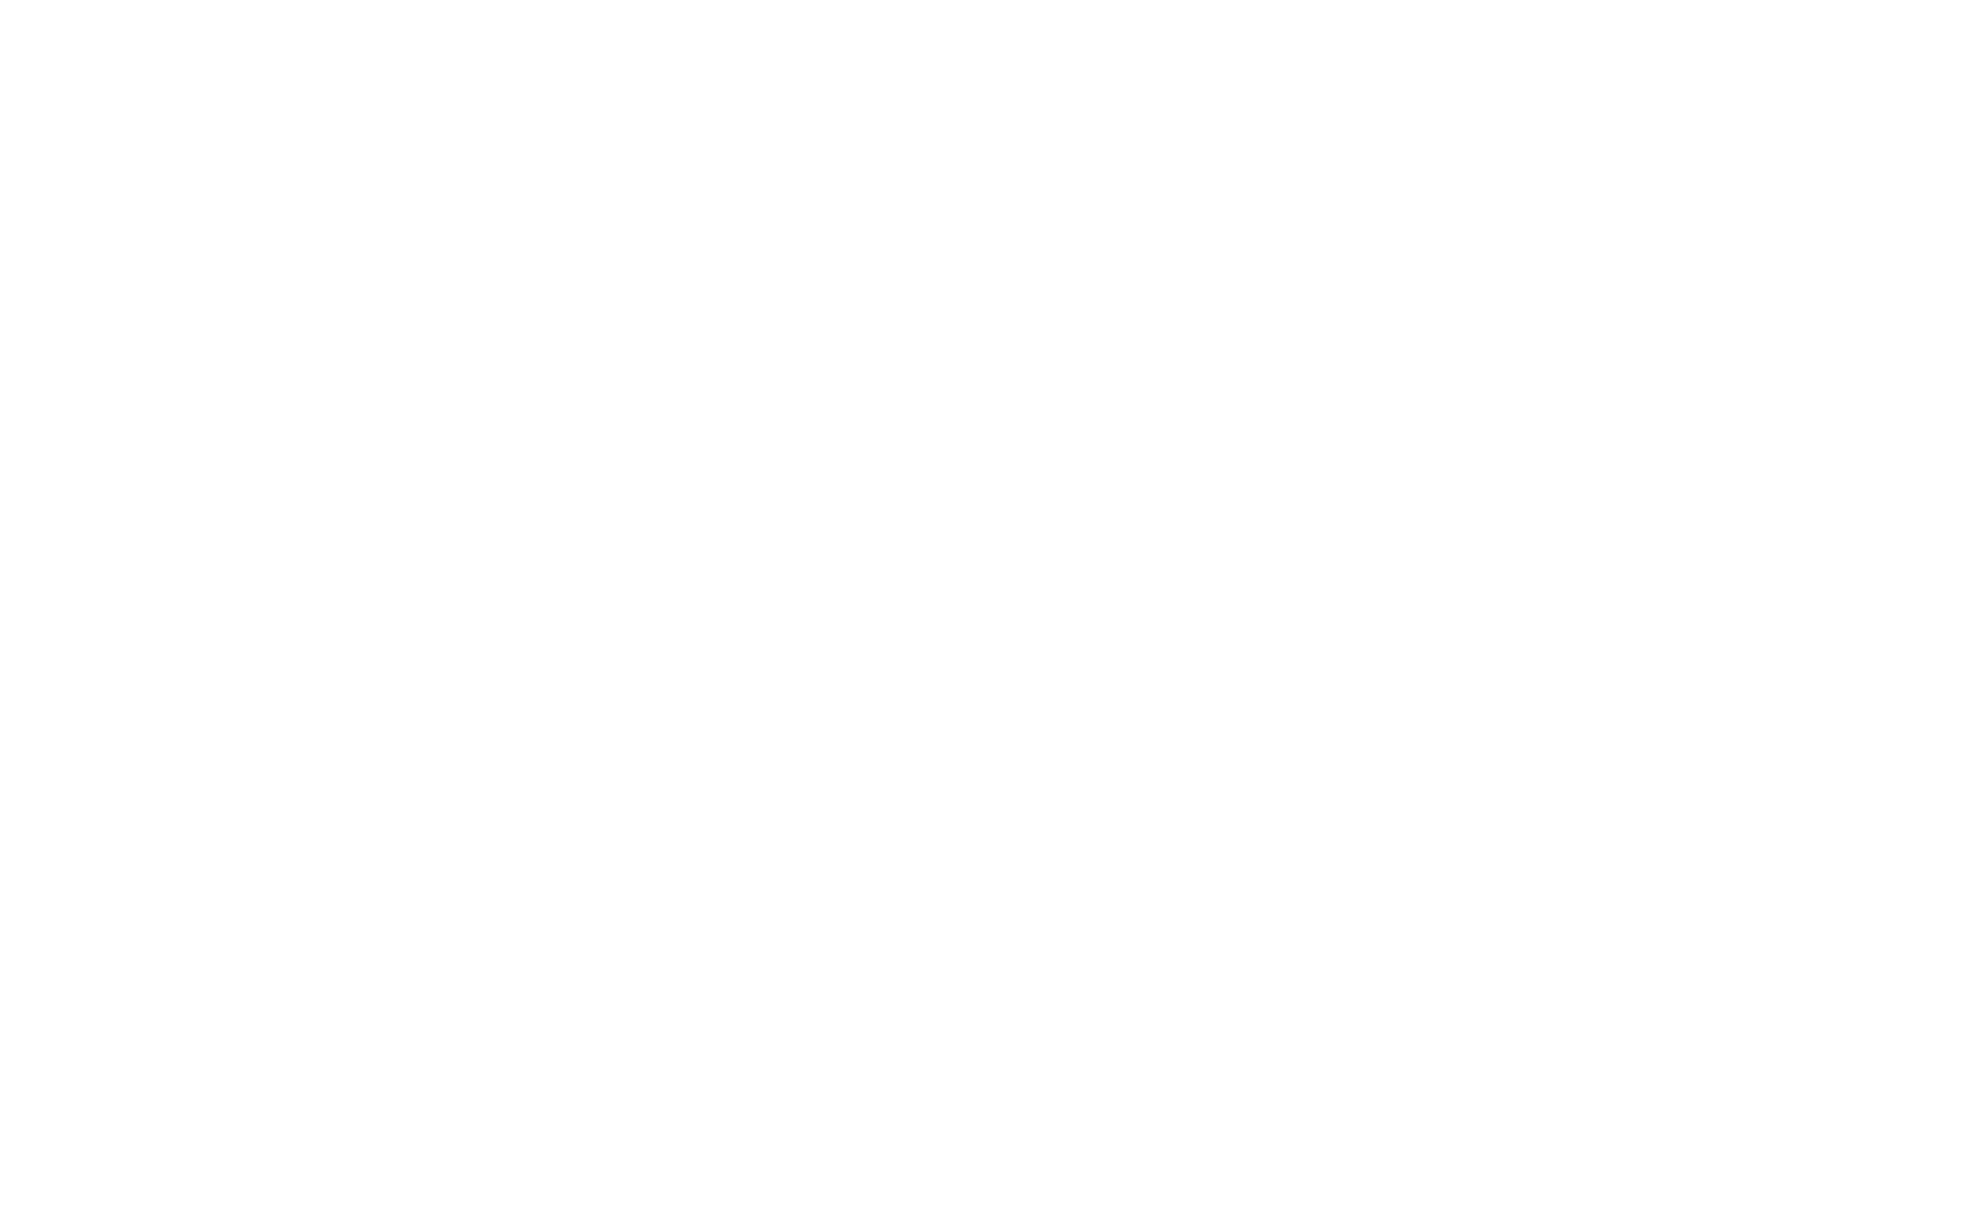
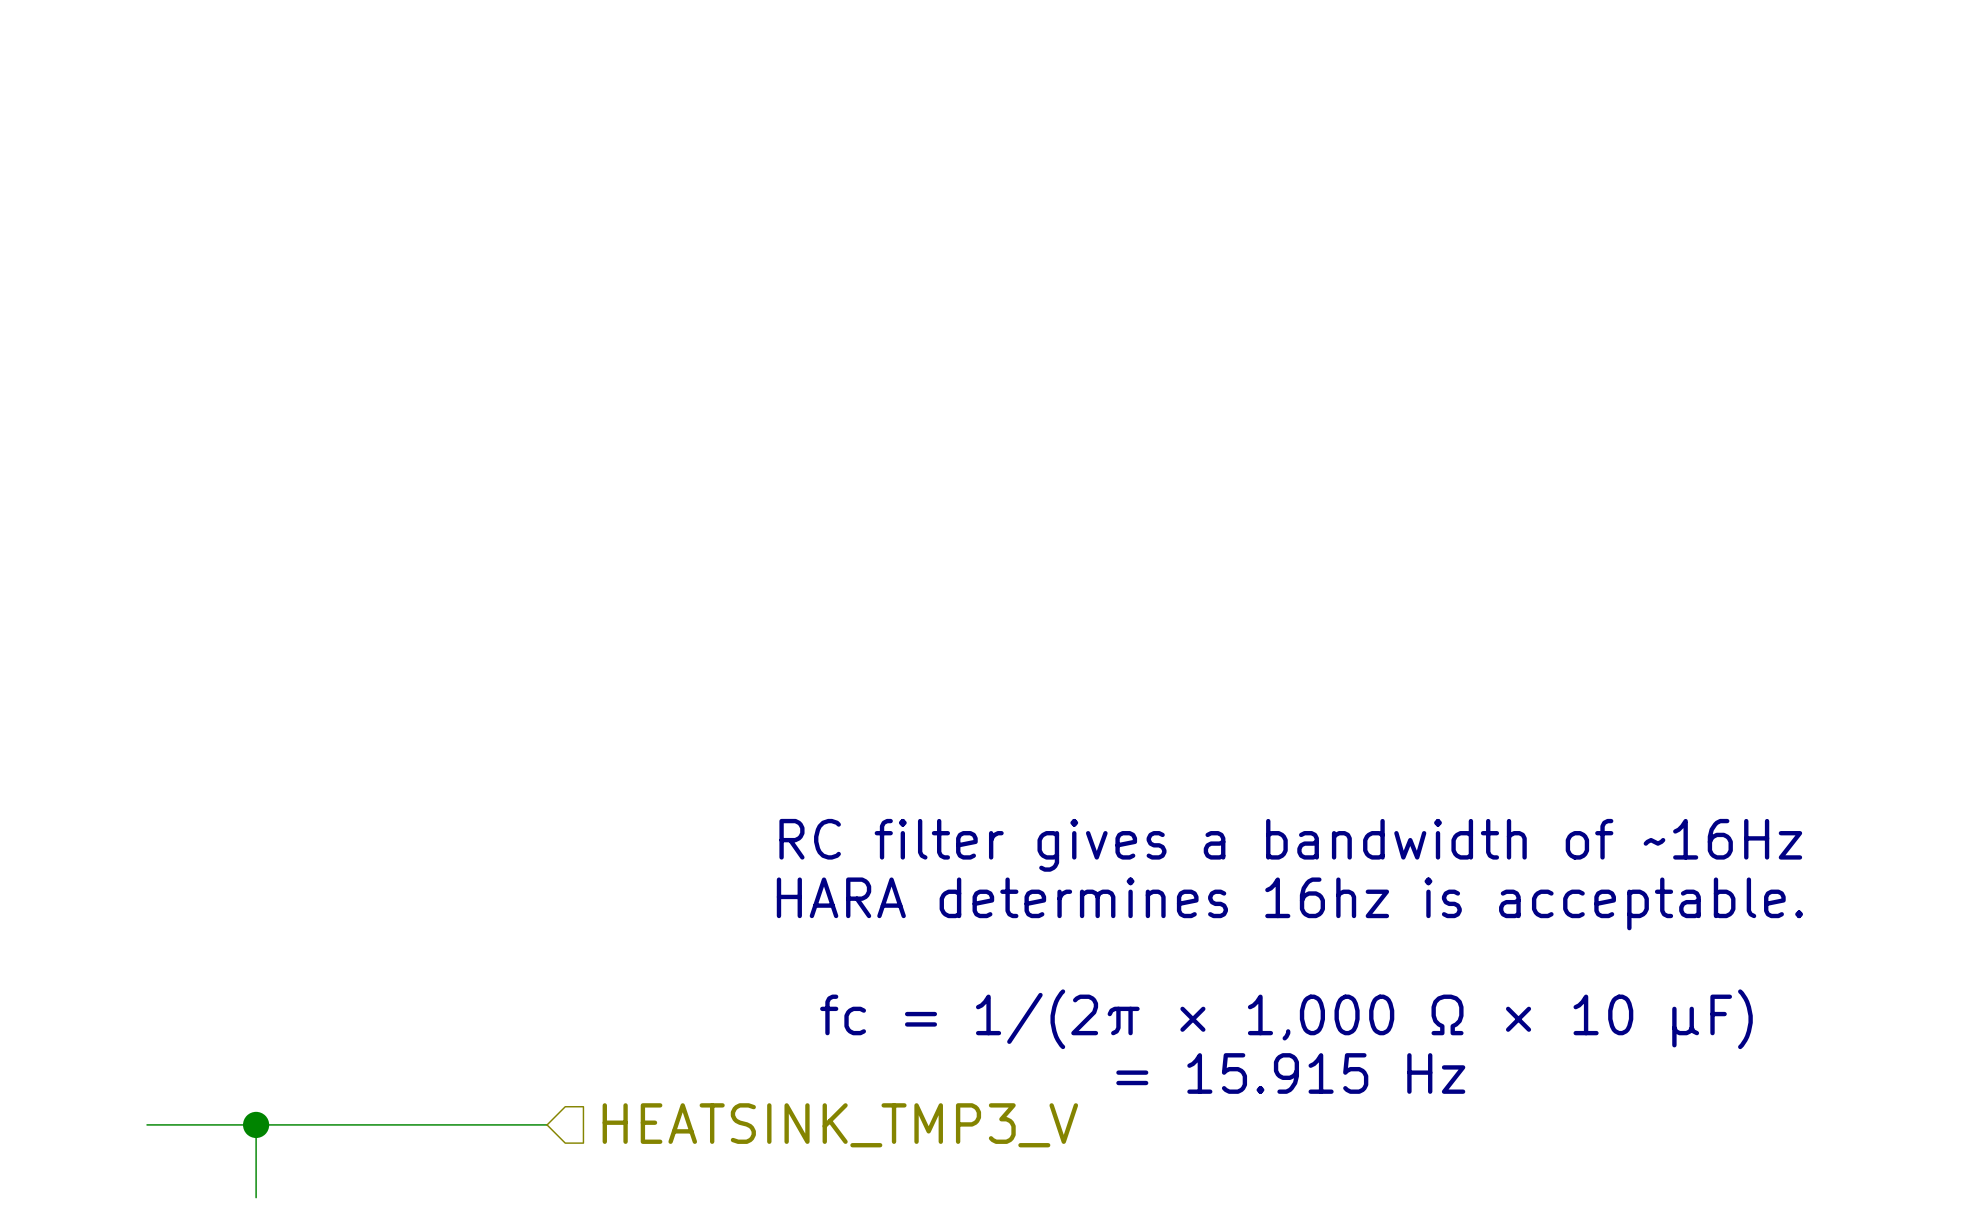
text: none -> RC filter gives a bandwidth of ~16Hz (1290, 845)
text: none -> HARA determines 16hz is acceptable. (1289, 903)
text: none -> fc = 1/(2π × 1,000 Ω × 10 μF) (1286, 1019)
text: none -> = 15.915 Hz (1290, 1073)
wire: none -> (146, 1124) (547, 1124)
wire: none -> (256, 1124) (256, 1197)
junction: none -> (256, 1124)
hierarchical label: none -> HEATSINK_TMP3_V (840, 1125)

